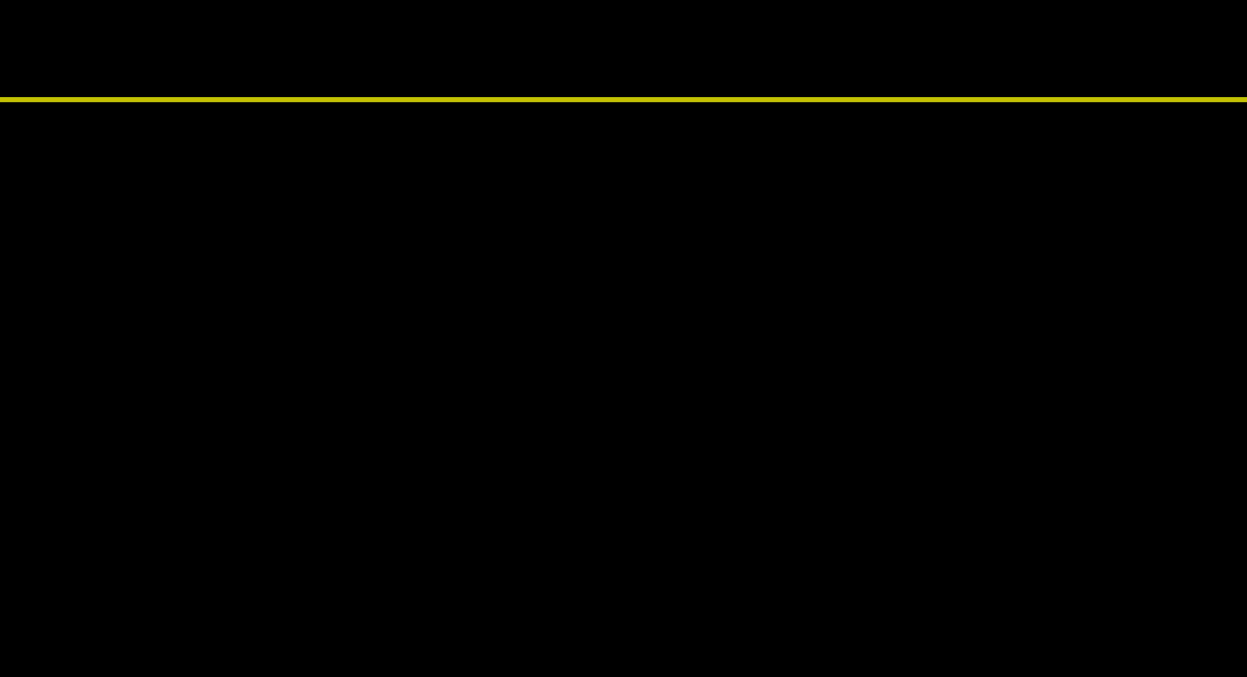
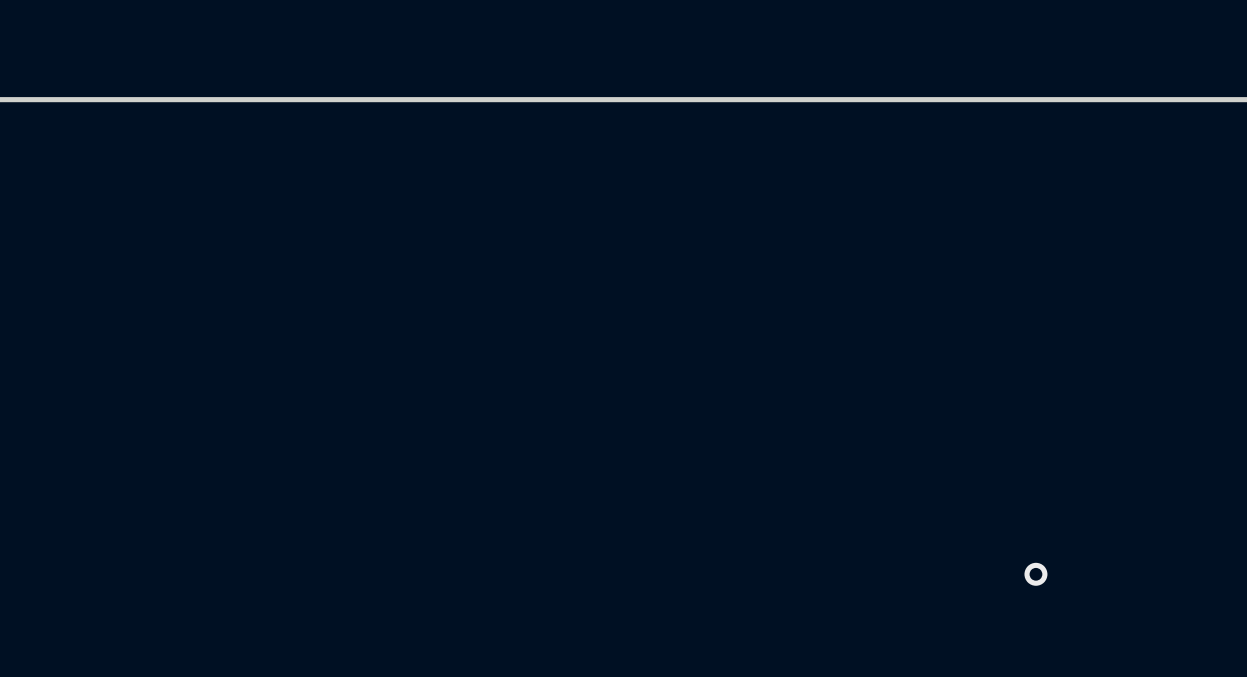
via: none -> (1035, 574)

